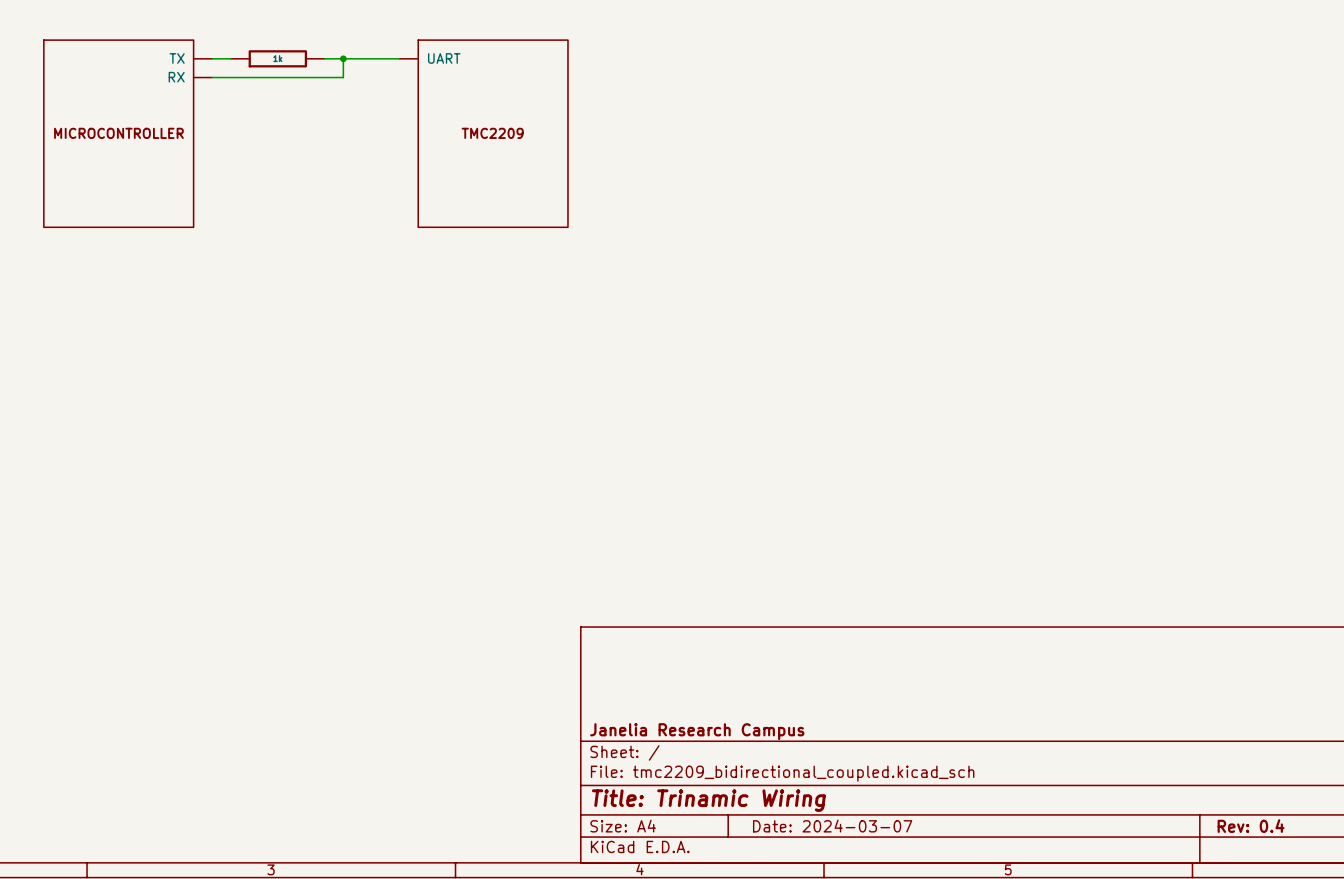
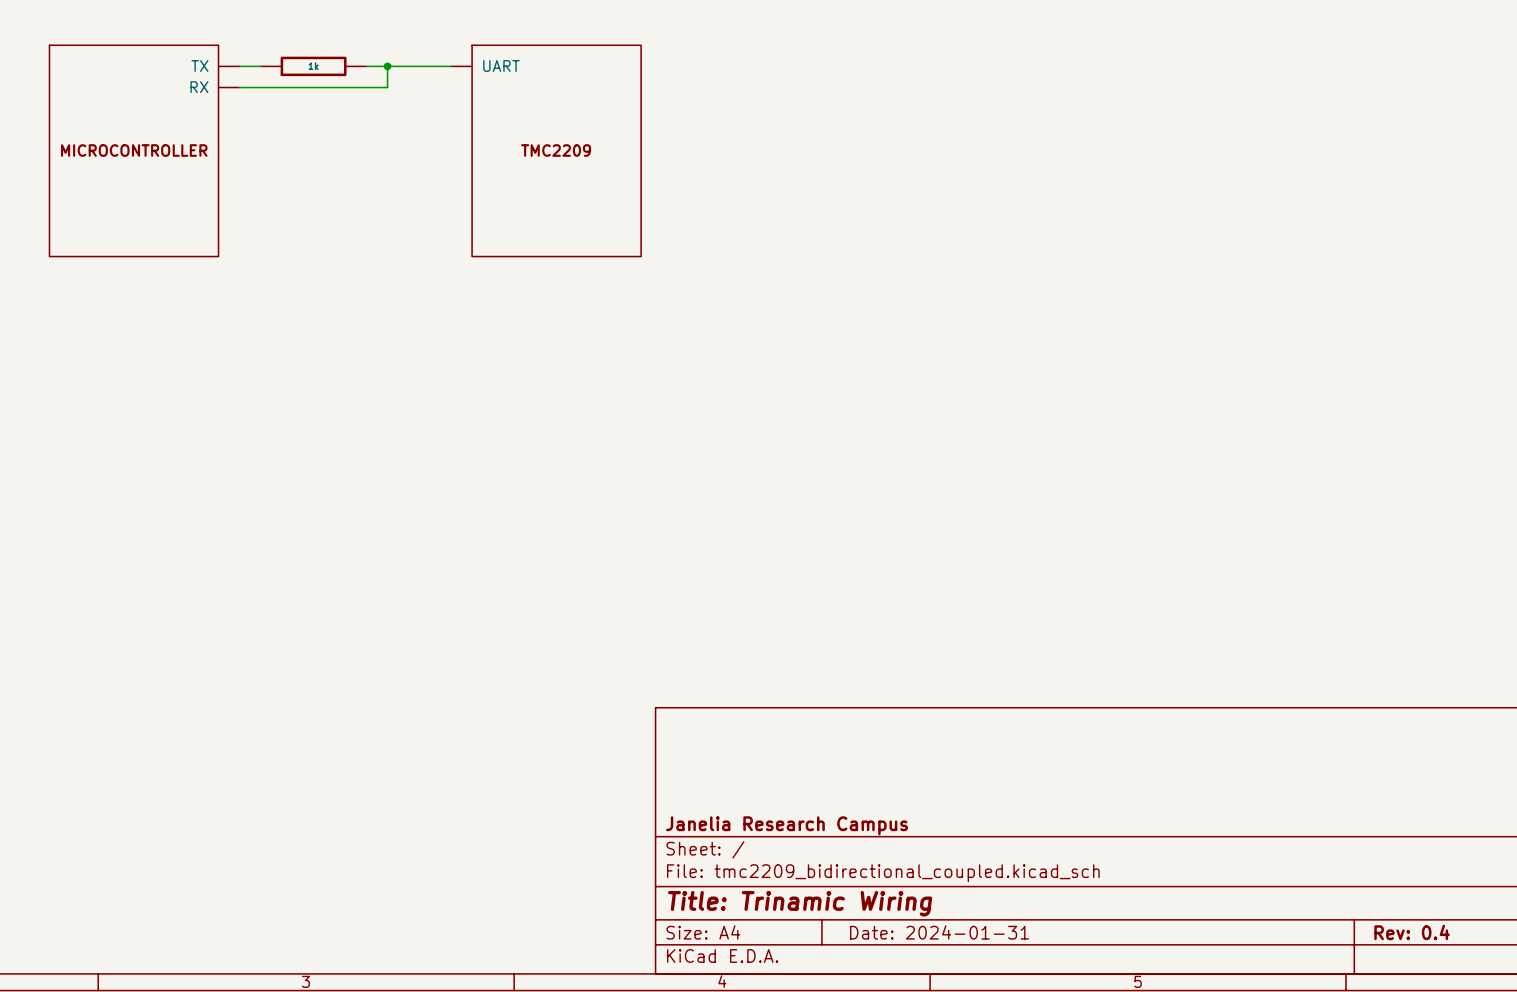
title block: Date: 2024-03-07 (832, 826) -> Date: 2024-01-31 (939, 932)

